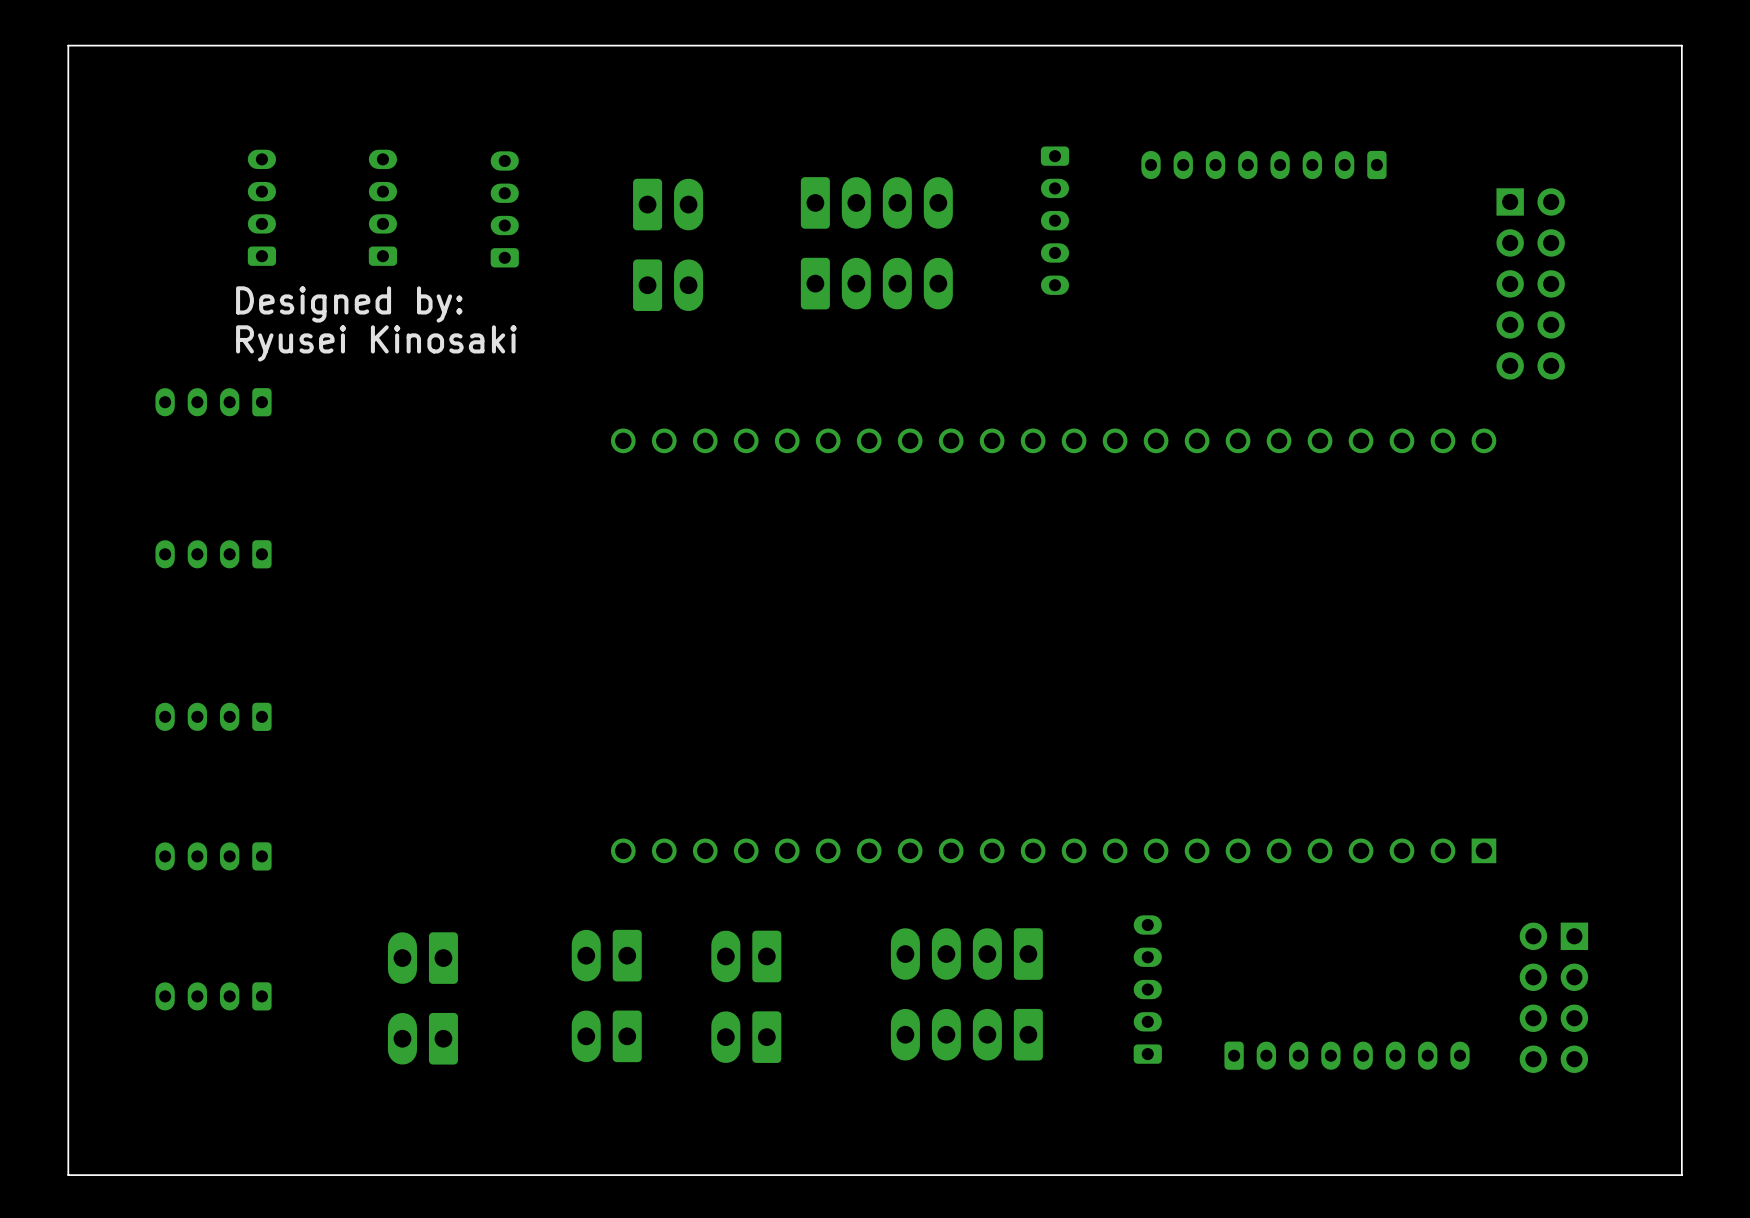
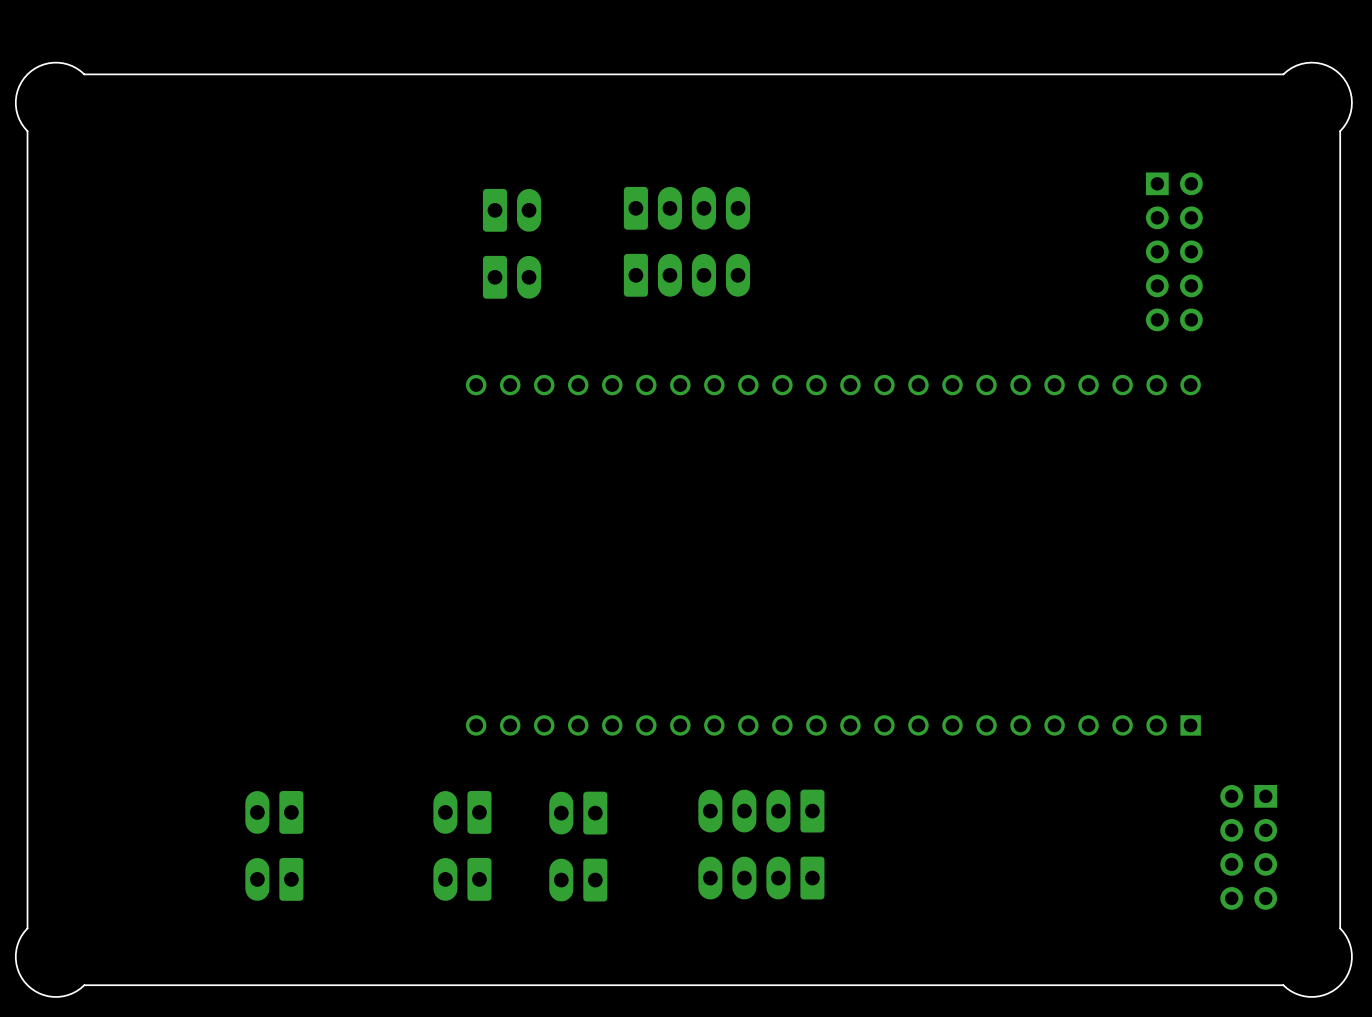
board edge: (1681, 45) (68, 45) (68, 1175) (1681, 1175) (1681, 45) -> (1283, 74) (1301, 63) (1317, 62) (1327, 65) (1336, 70) (1346, 82) (1351, 102) (1348, 118) (1340, 131) (1340, 928) (1350, 944) (1351, 959) (1348, 973) (1336, 988) (1323, 995) (1309, 996) (1295, 993) (1283, 985) (84, 985) (67, 995) (53, 996) (39, 993) (24, 981) (17, 968) (15, 954) (19, 940) (27, 928) (27, 131) (19, 119) (15, 100) (19, 86) (31, 71) (43, 64) (58, 62) (72, 66) (84, 74) (1283, 74)
part: (1263, 165) -> none
part: (261, 207) -> none
part: (382, 207) -> none
part: (504, 209) -> none
part: (1054, 220) -> none
part position: (876, 243) -> (686, 241)
part position: (668, 244) -> (512, 243)
part position: (1530, 283) -> (1174, 251)
text: Designed by: (349, 304) -> none
text: Ryusei Kinosaki (376, 343) -> none
part: (213, 402) -> none
part: (213, 554) -> none
part: (213, 716) -> none
part: (213, 856) -> none
part: (1147, 989) -> none
part: (213, 996) -> none
part position: (422, 998) -> (274, 845)
part: (1347, 1055) -> none

